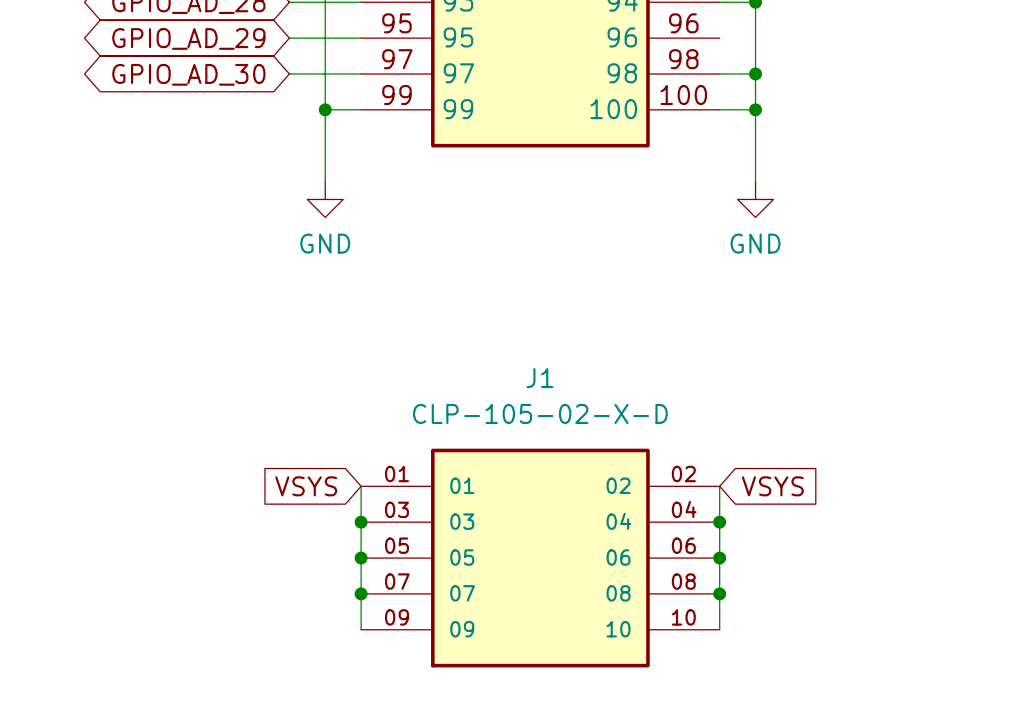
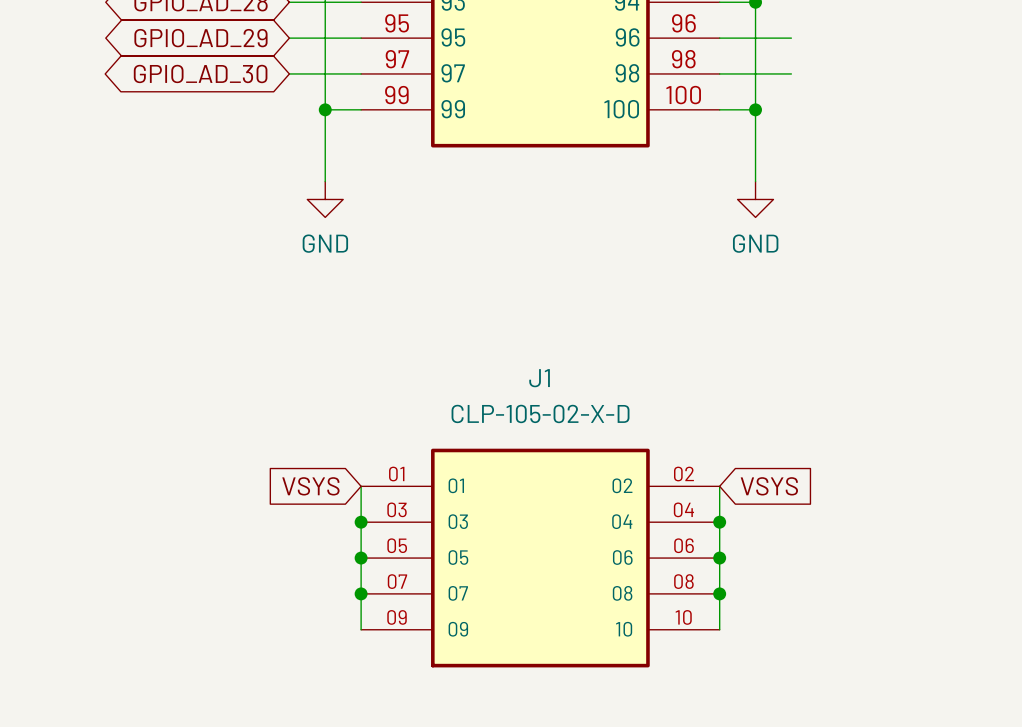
wire: none -> (719, 38) (791, 38)
wire: none -> (755, 73) (791, 73)
junction: (755, 73) -> none

